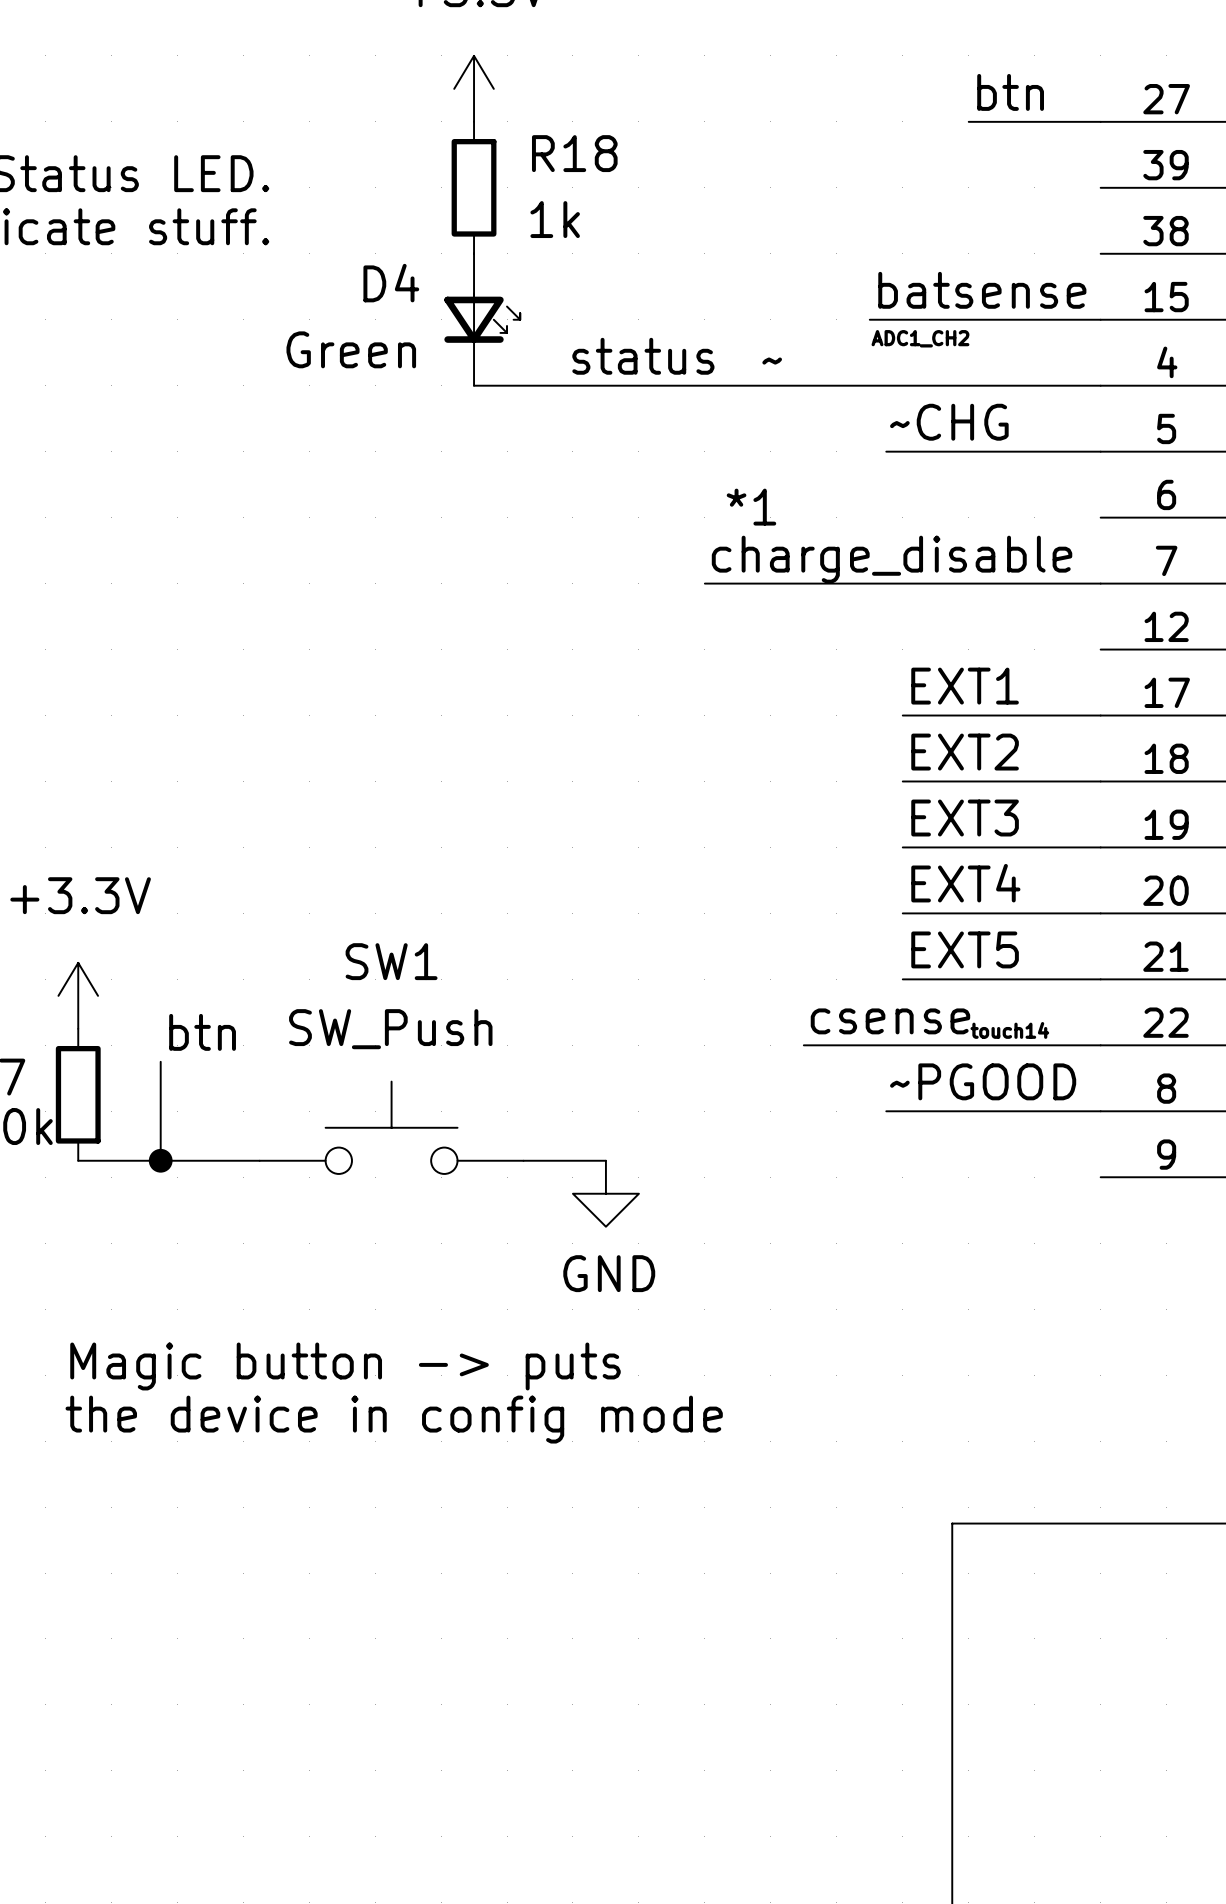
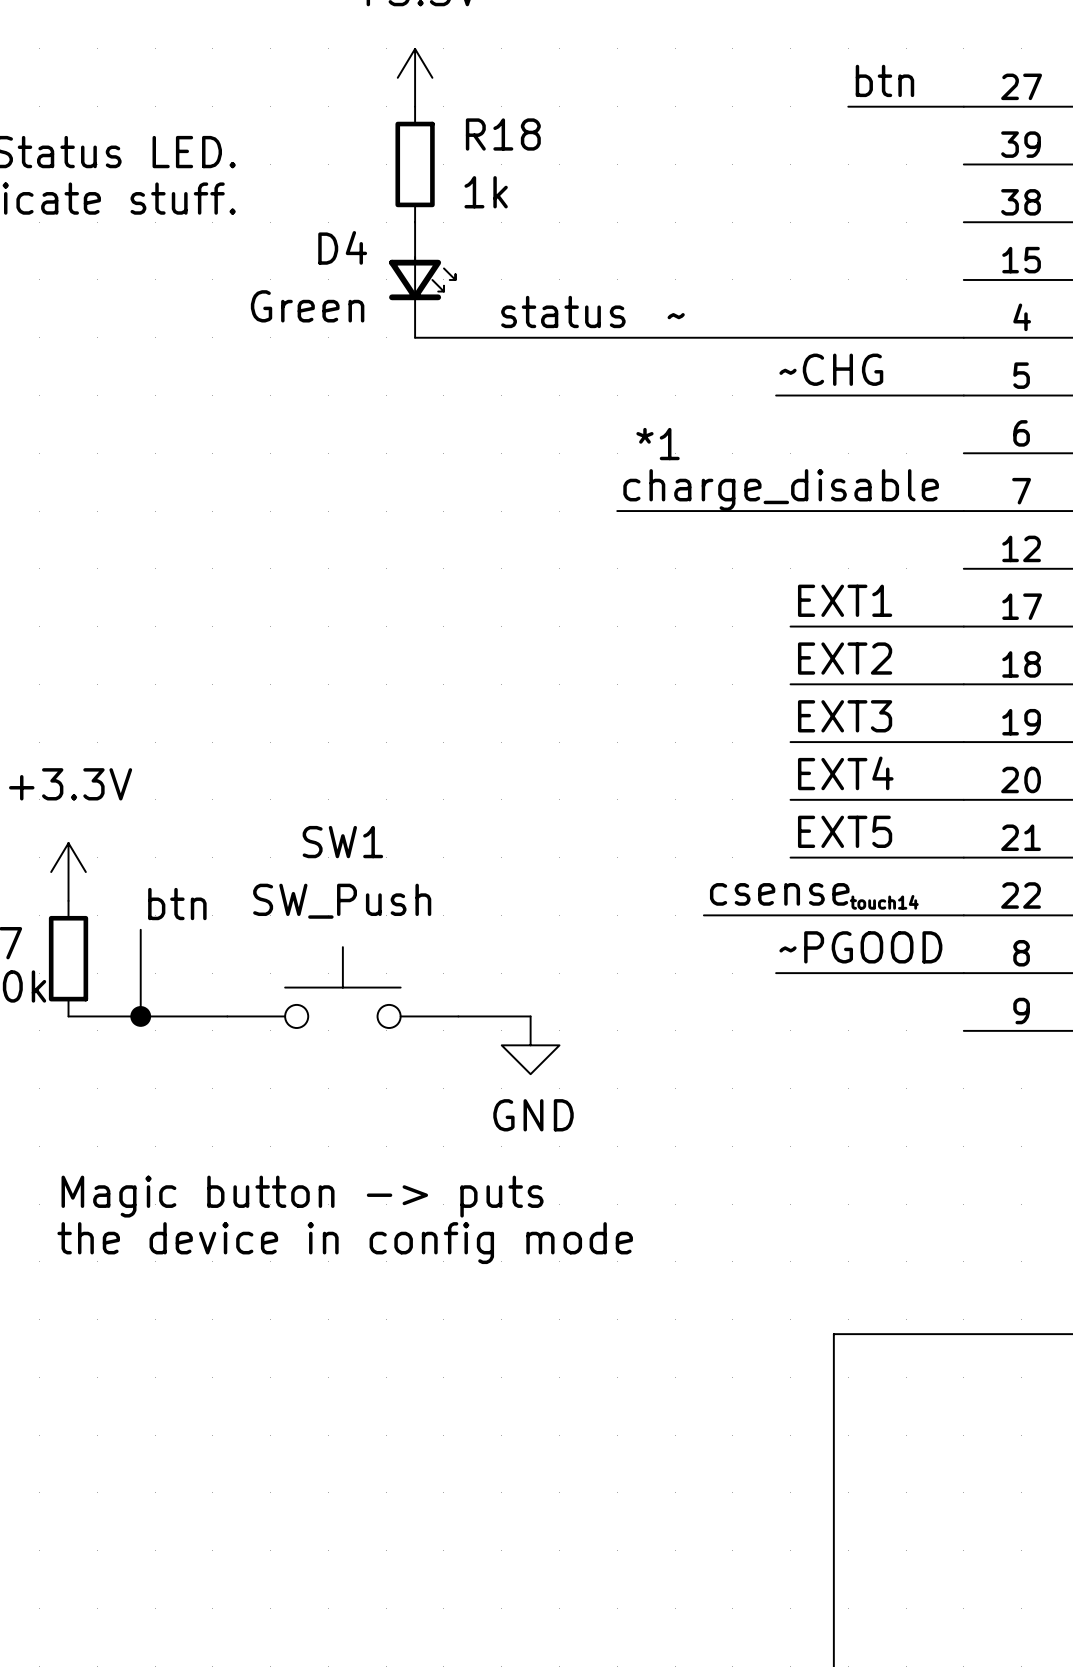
label: batsense (982, 290) -> none
wire: (869, 319) (1100, 319) -> none
text: ADC1_CH2 (920, 338) -> none

